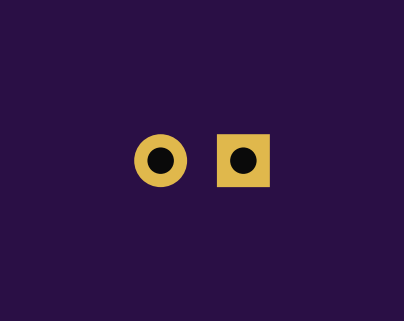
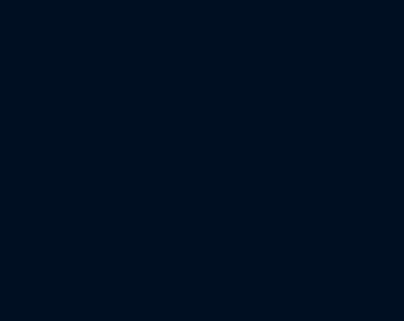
part: (202, 160) -> none

